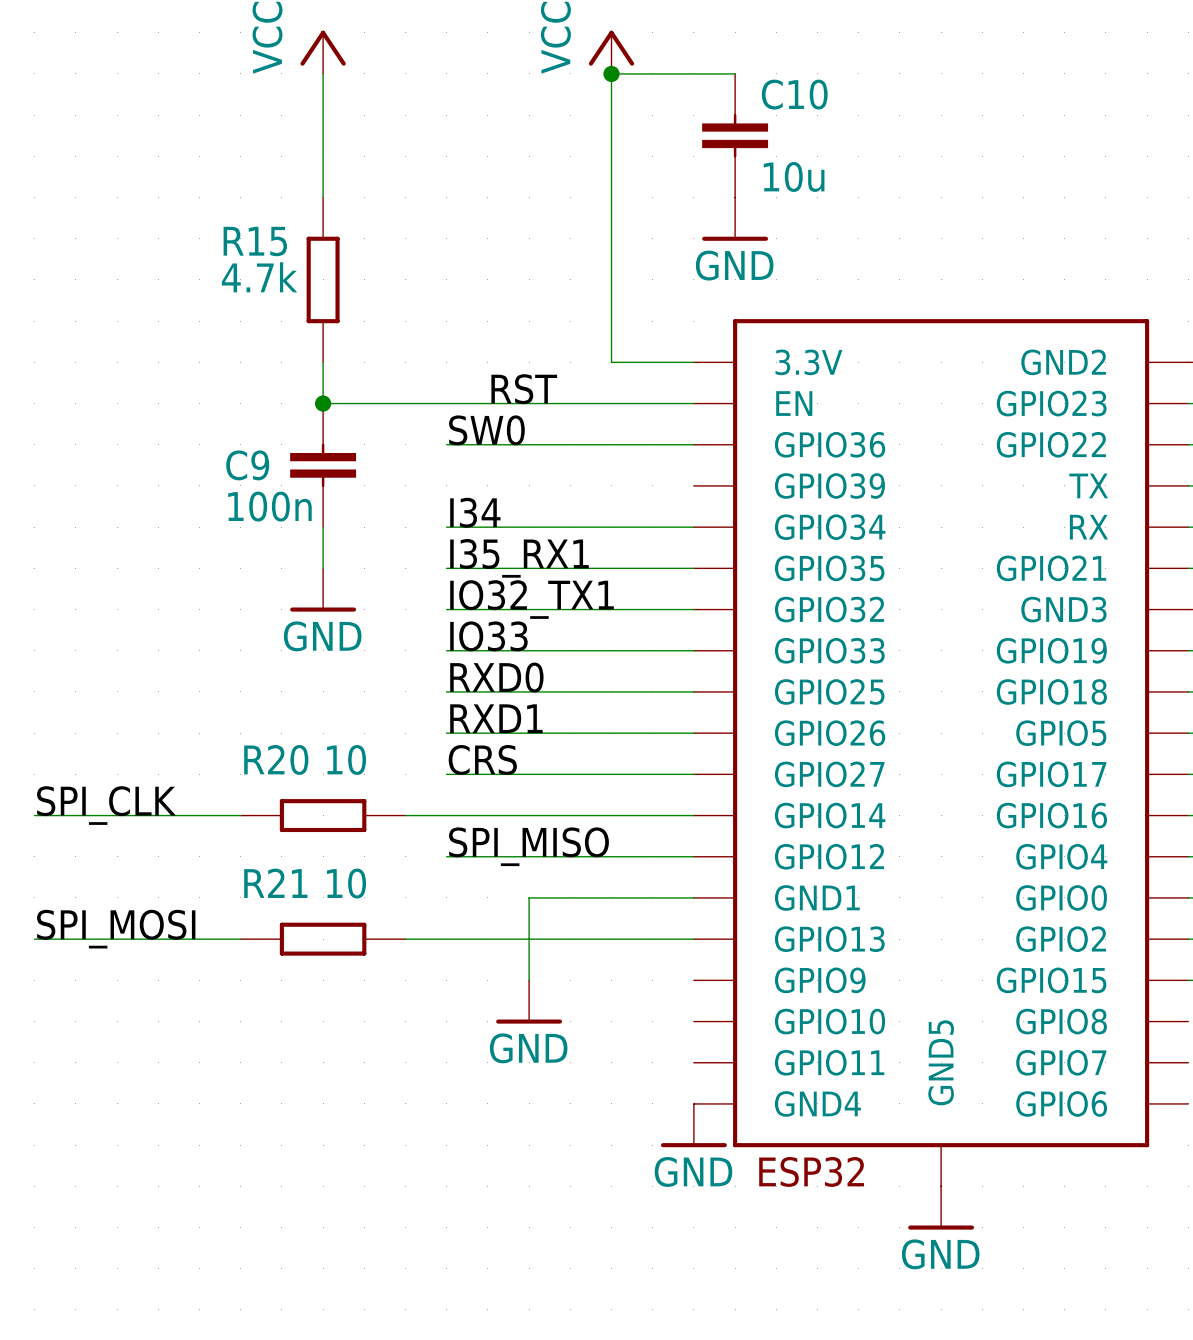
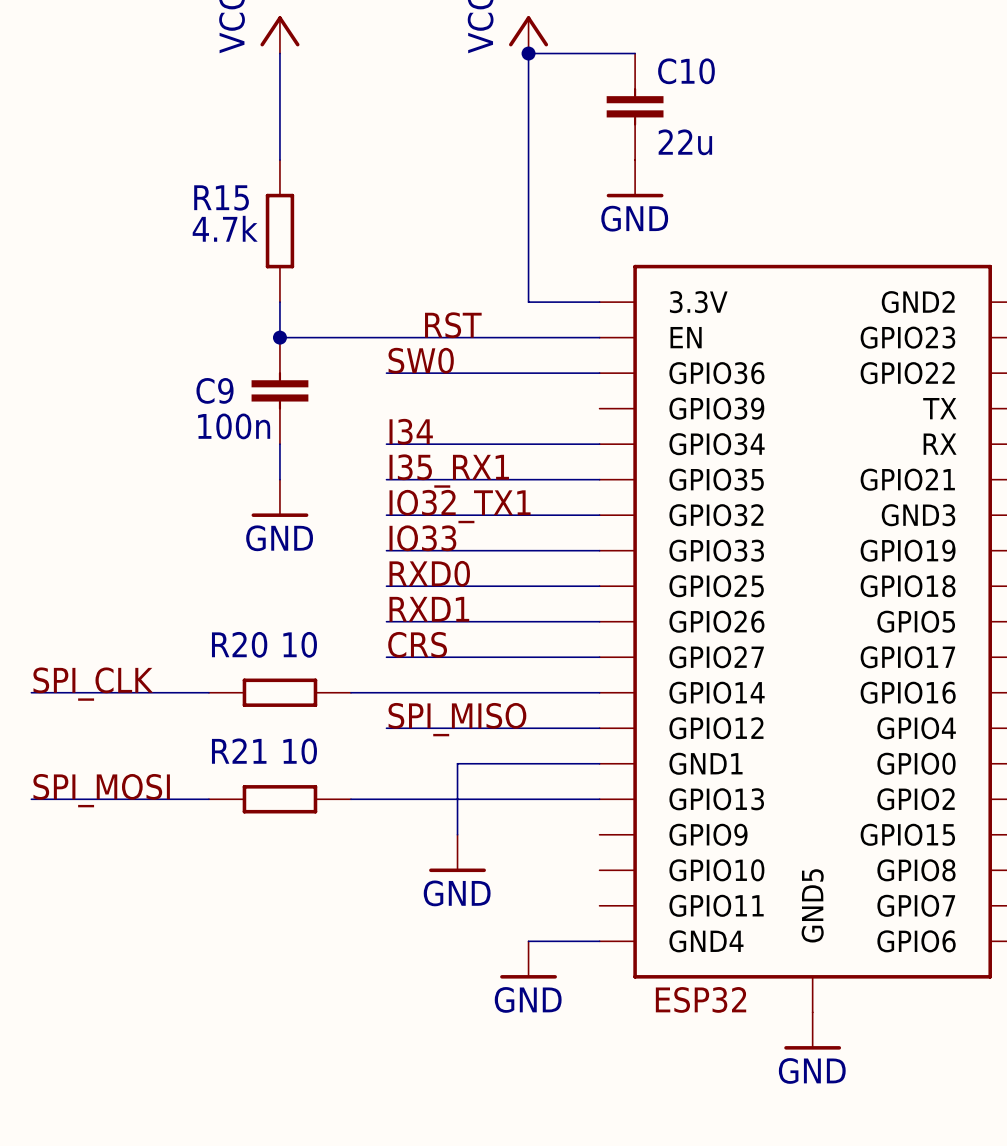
C10 value: 10u (794, 176) -> 22u (685, 142)
wire: none -> (528, 941) (599, 941)
power symbol position: GND (693, 1125) -> GND (528, 959)

